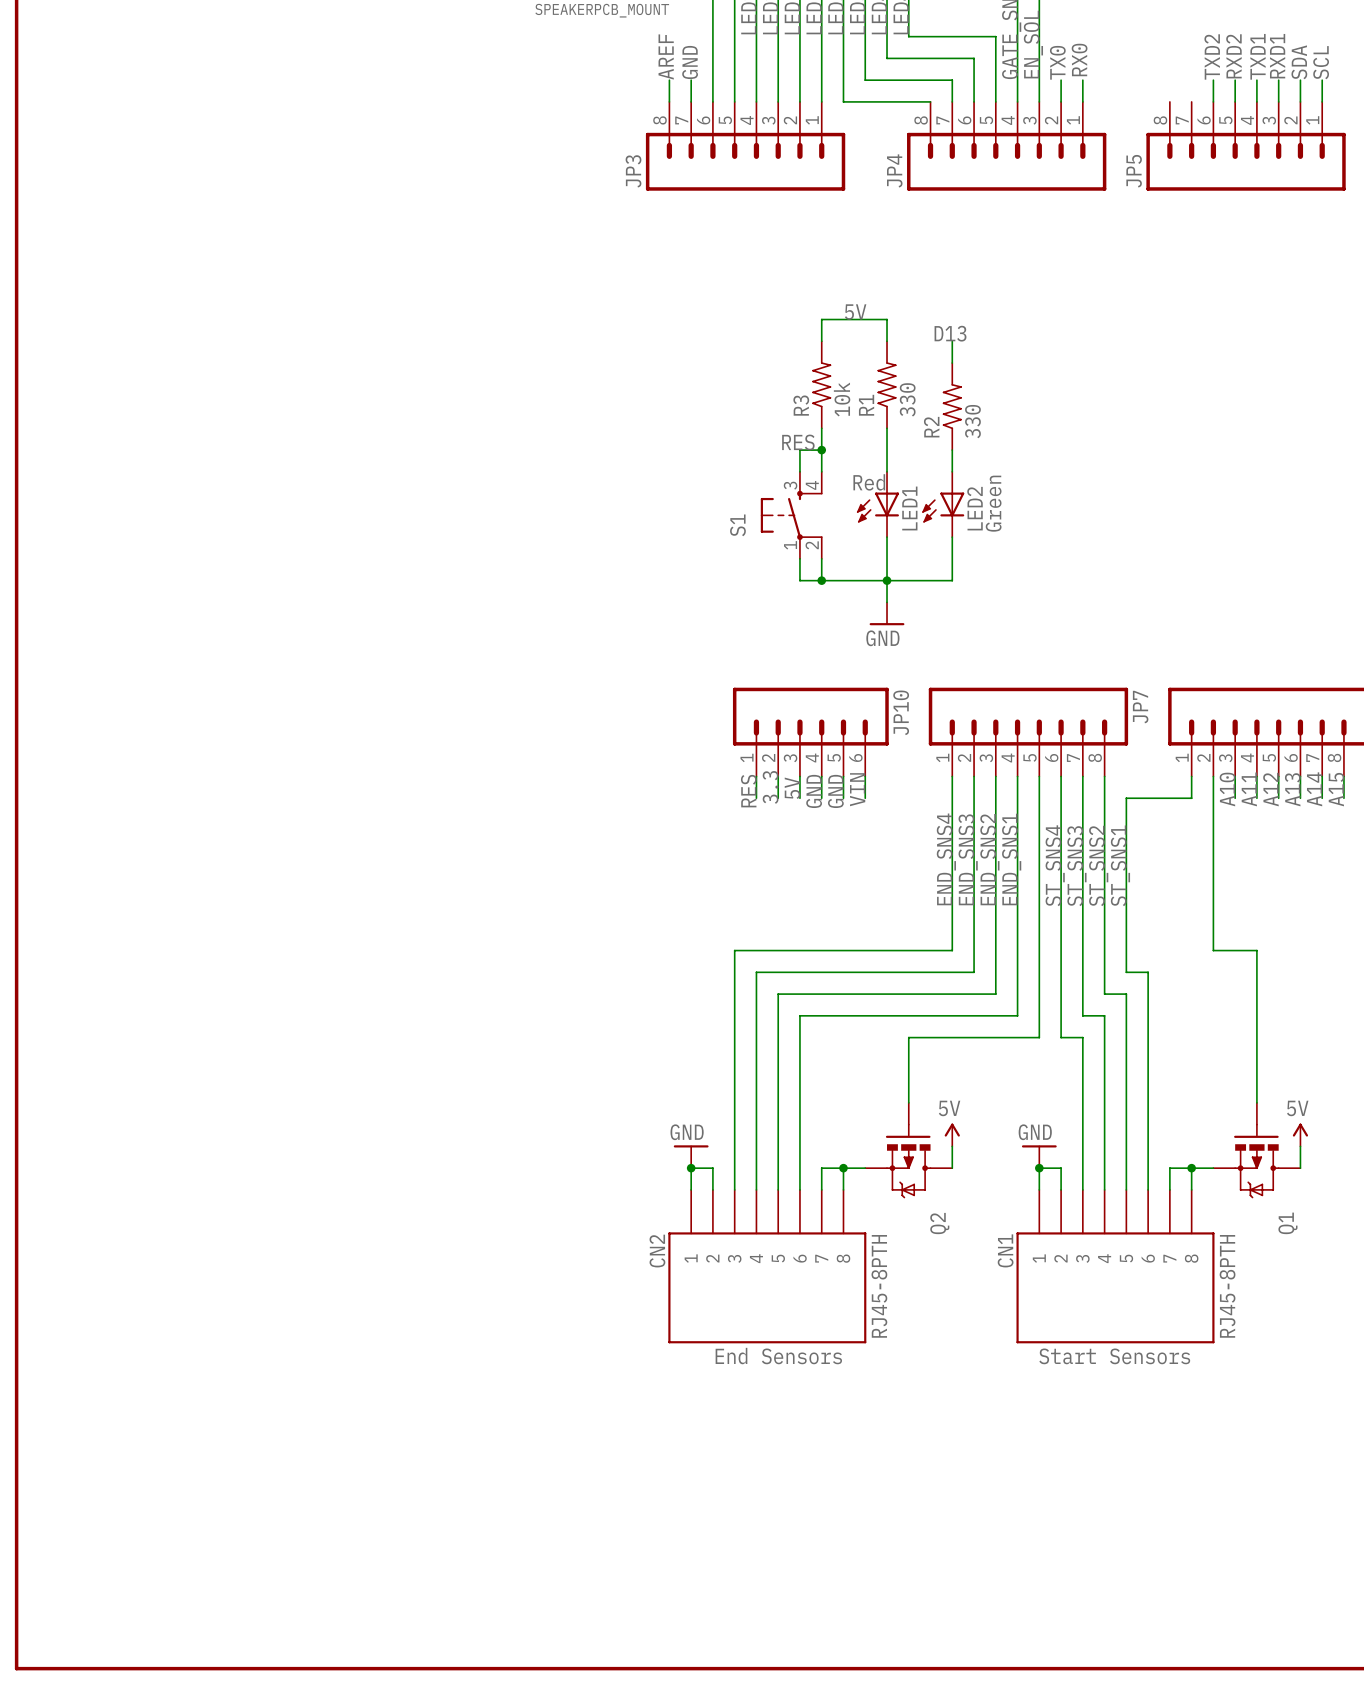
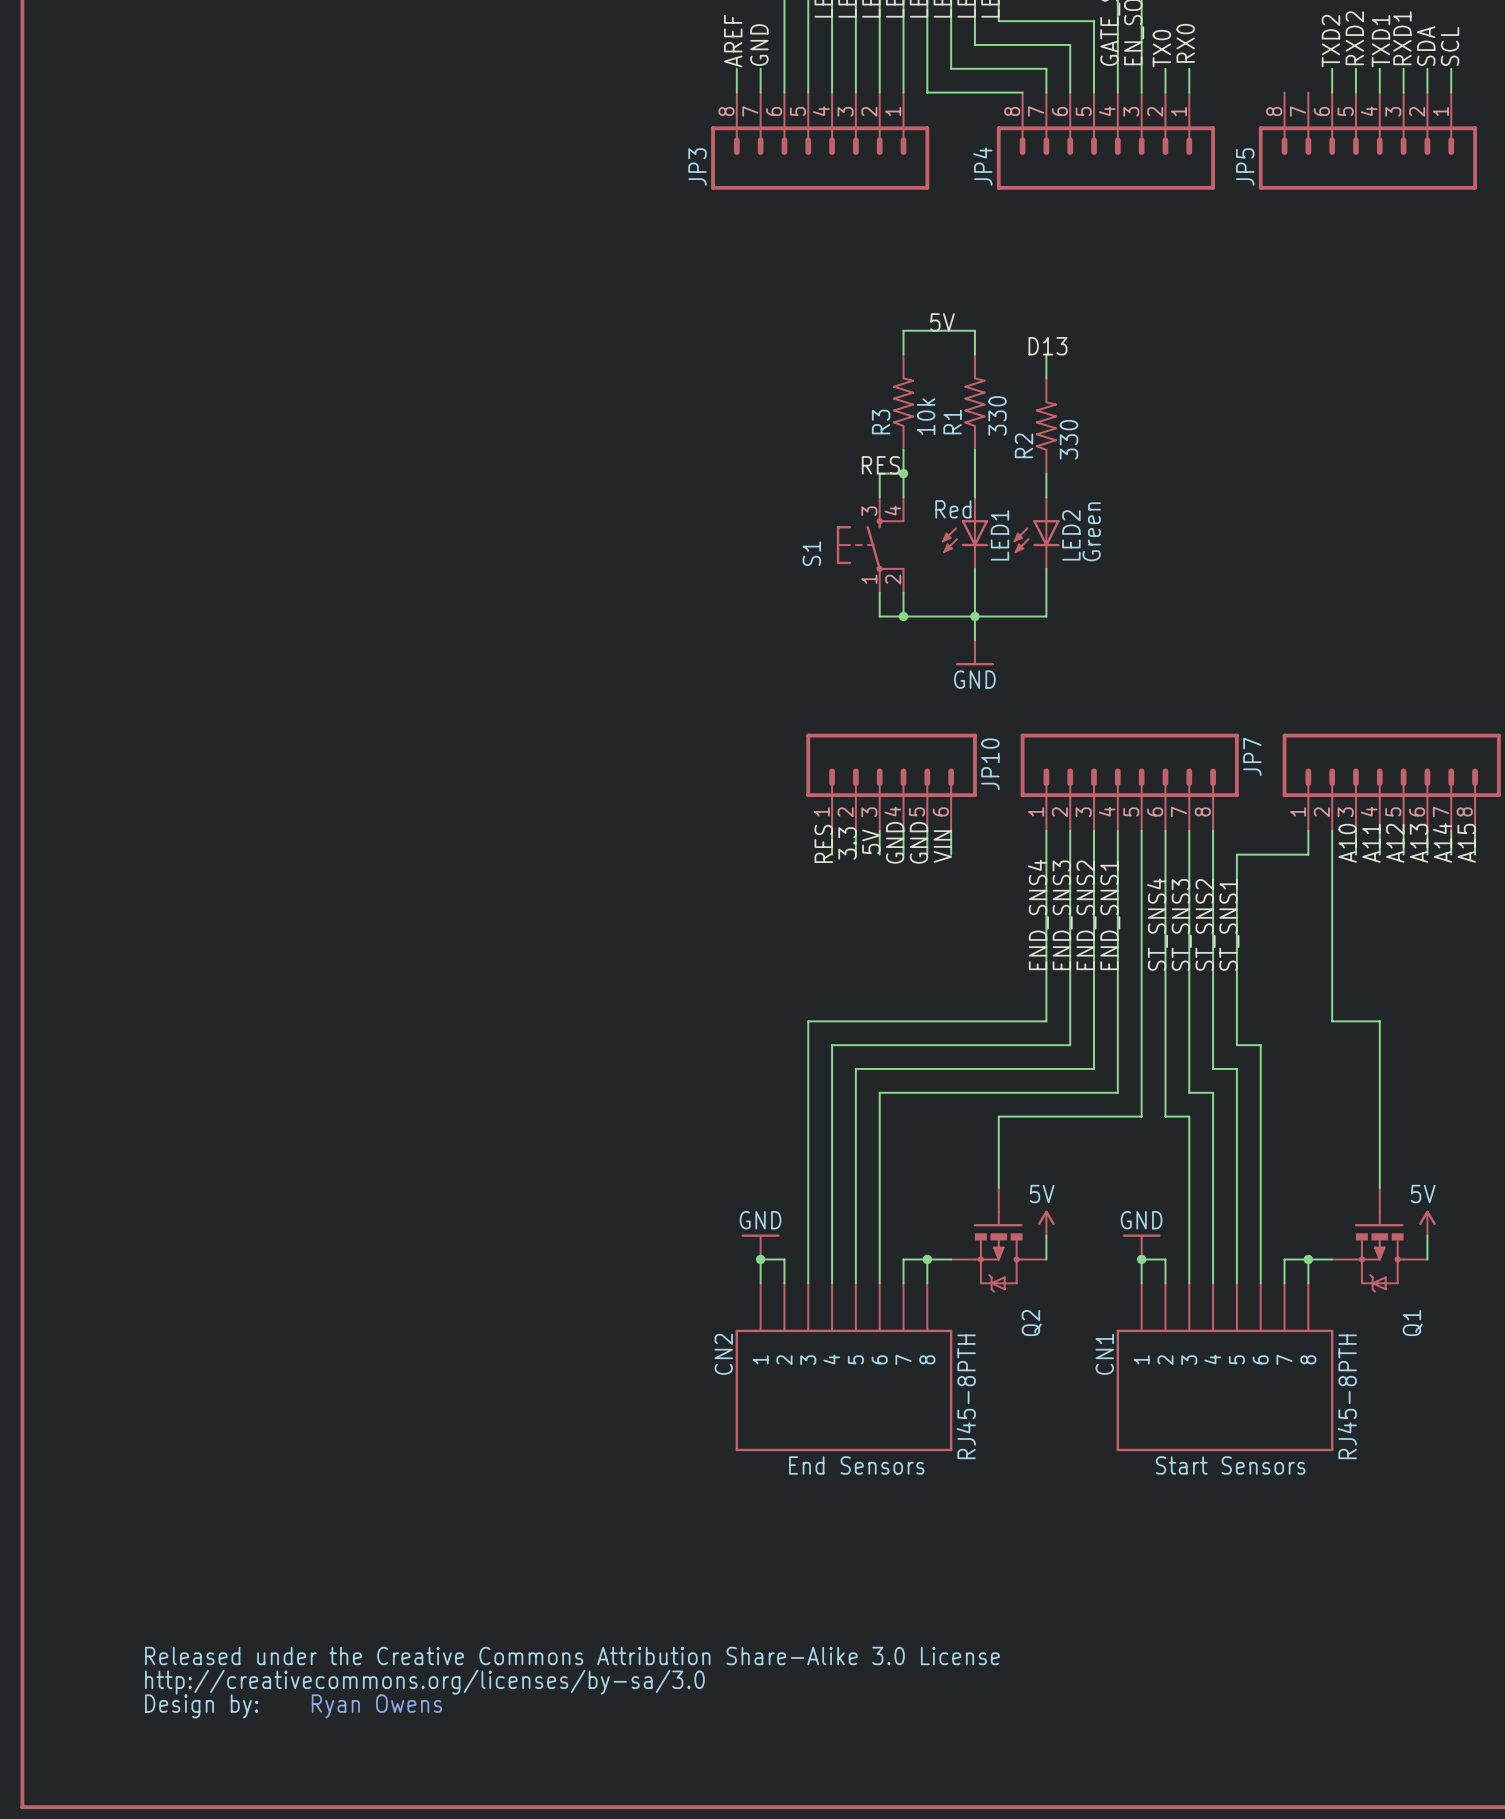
part: none -> (572, 1682)
text: none -> Ryan Owens (376, 1706)

